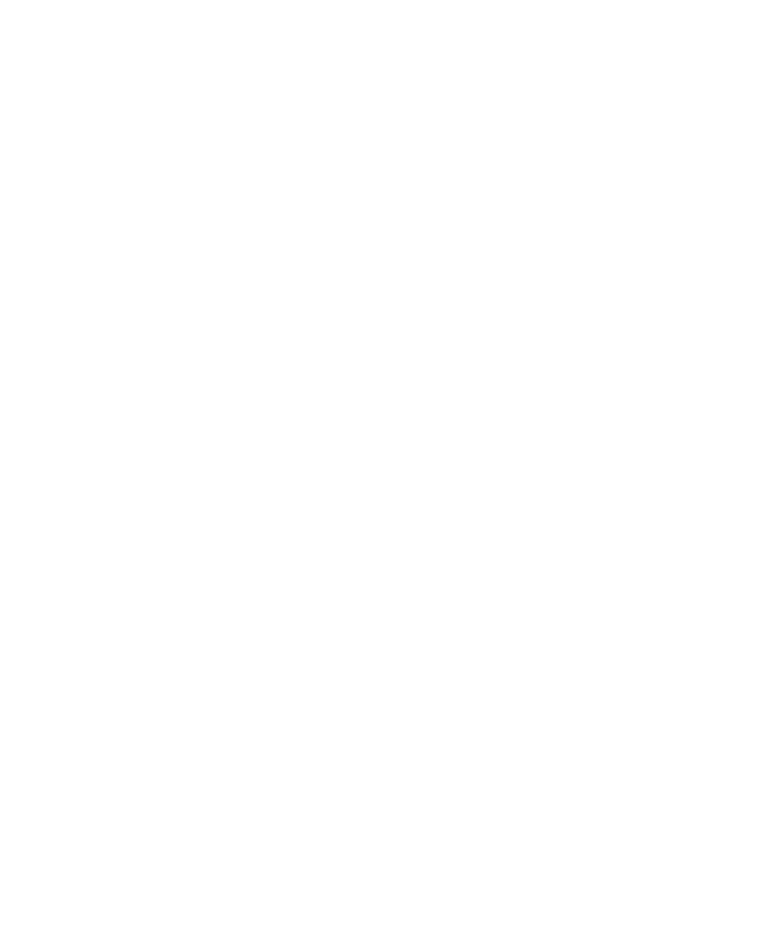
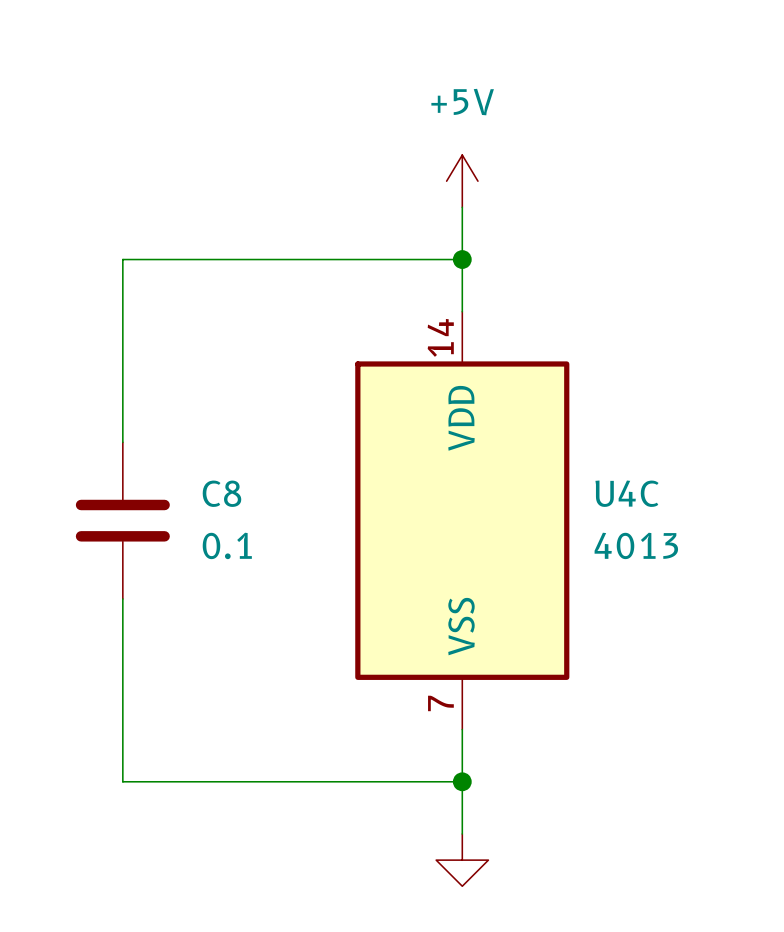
power symbol: none -> +5V (462, 181)
wire: none -> (462, 207) (462, 311)
wire: none -> (462, 259) (122, 259) (122, 442)
junction: none -> (462, 259)
C8: none -> 0.1 (122, 520)
U4C: none -> 4013 (462, 520)
wire: none -> (122, 599) (122, 781) (462, 781)
wire: none -> (462, 729) (462, 834)
junction: none -> (462, 781)
power symbol: none -> (462, 860)

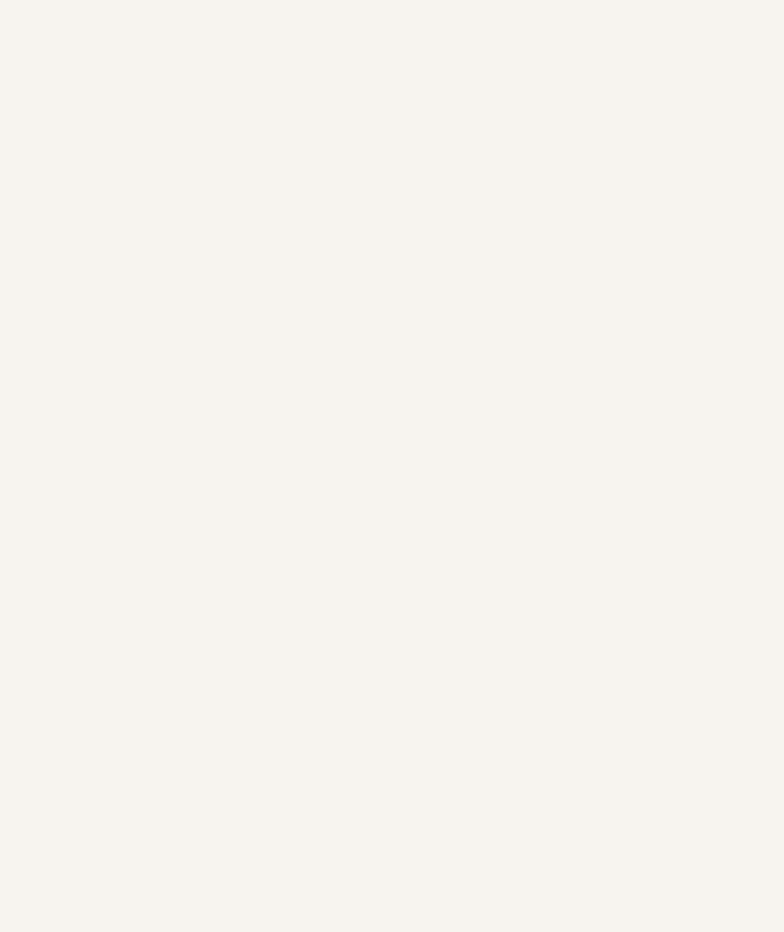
power symbol: +5V (462, 181) -> none
wire: (462, 207) (462, 311) -> none
wire: (462, 259) (122, 259) (122, 442) -> none
junction: (462, 259) -> none
C8: 0.1 (122, 520) -> none
U4C: 4013 (462, 520) -> none
wire: (122, 599) (122, 781) (462, 781) -> none
wire: (462, 729) (462, 834) -> none
junction: (462, 781) -> none
power symbol: (462, 860) -> none

